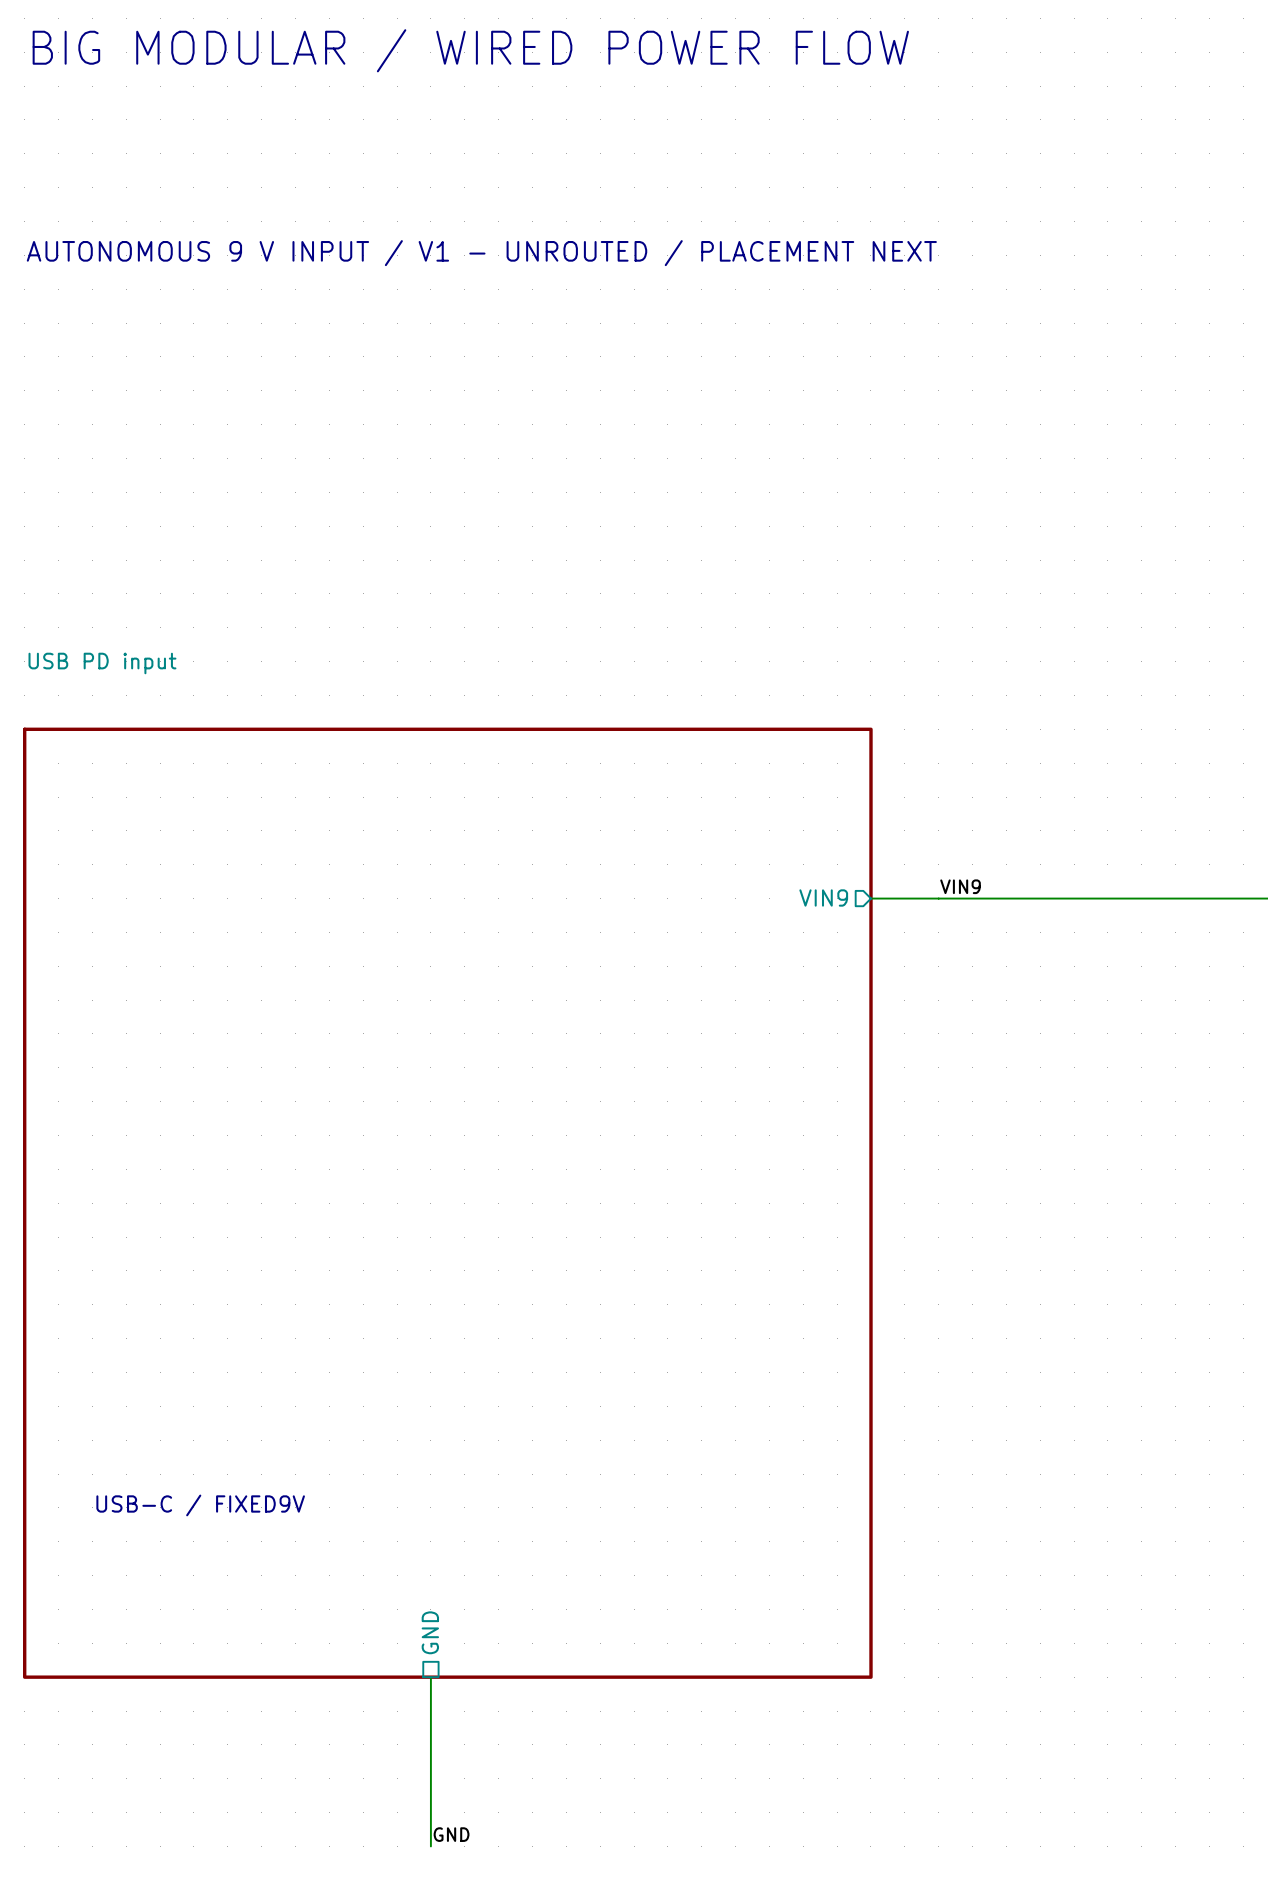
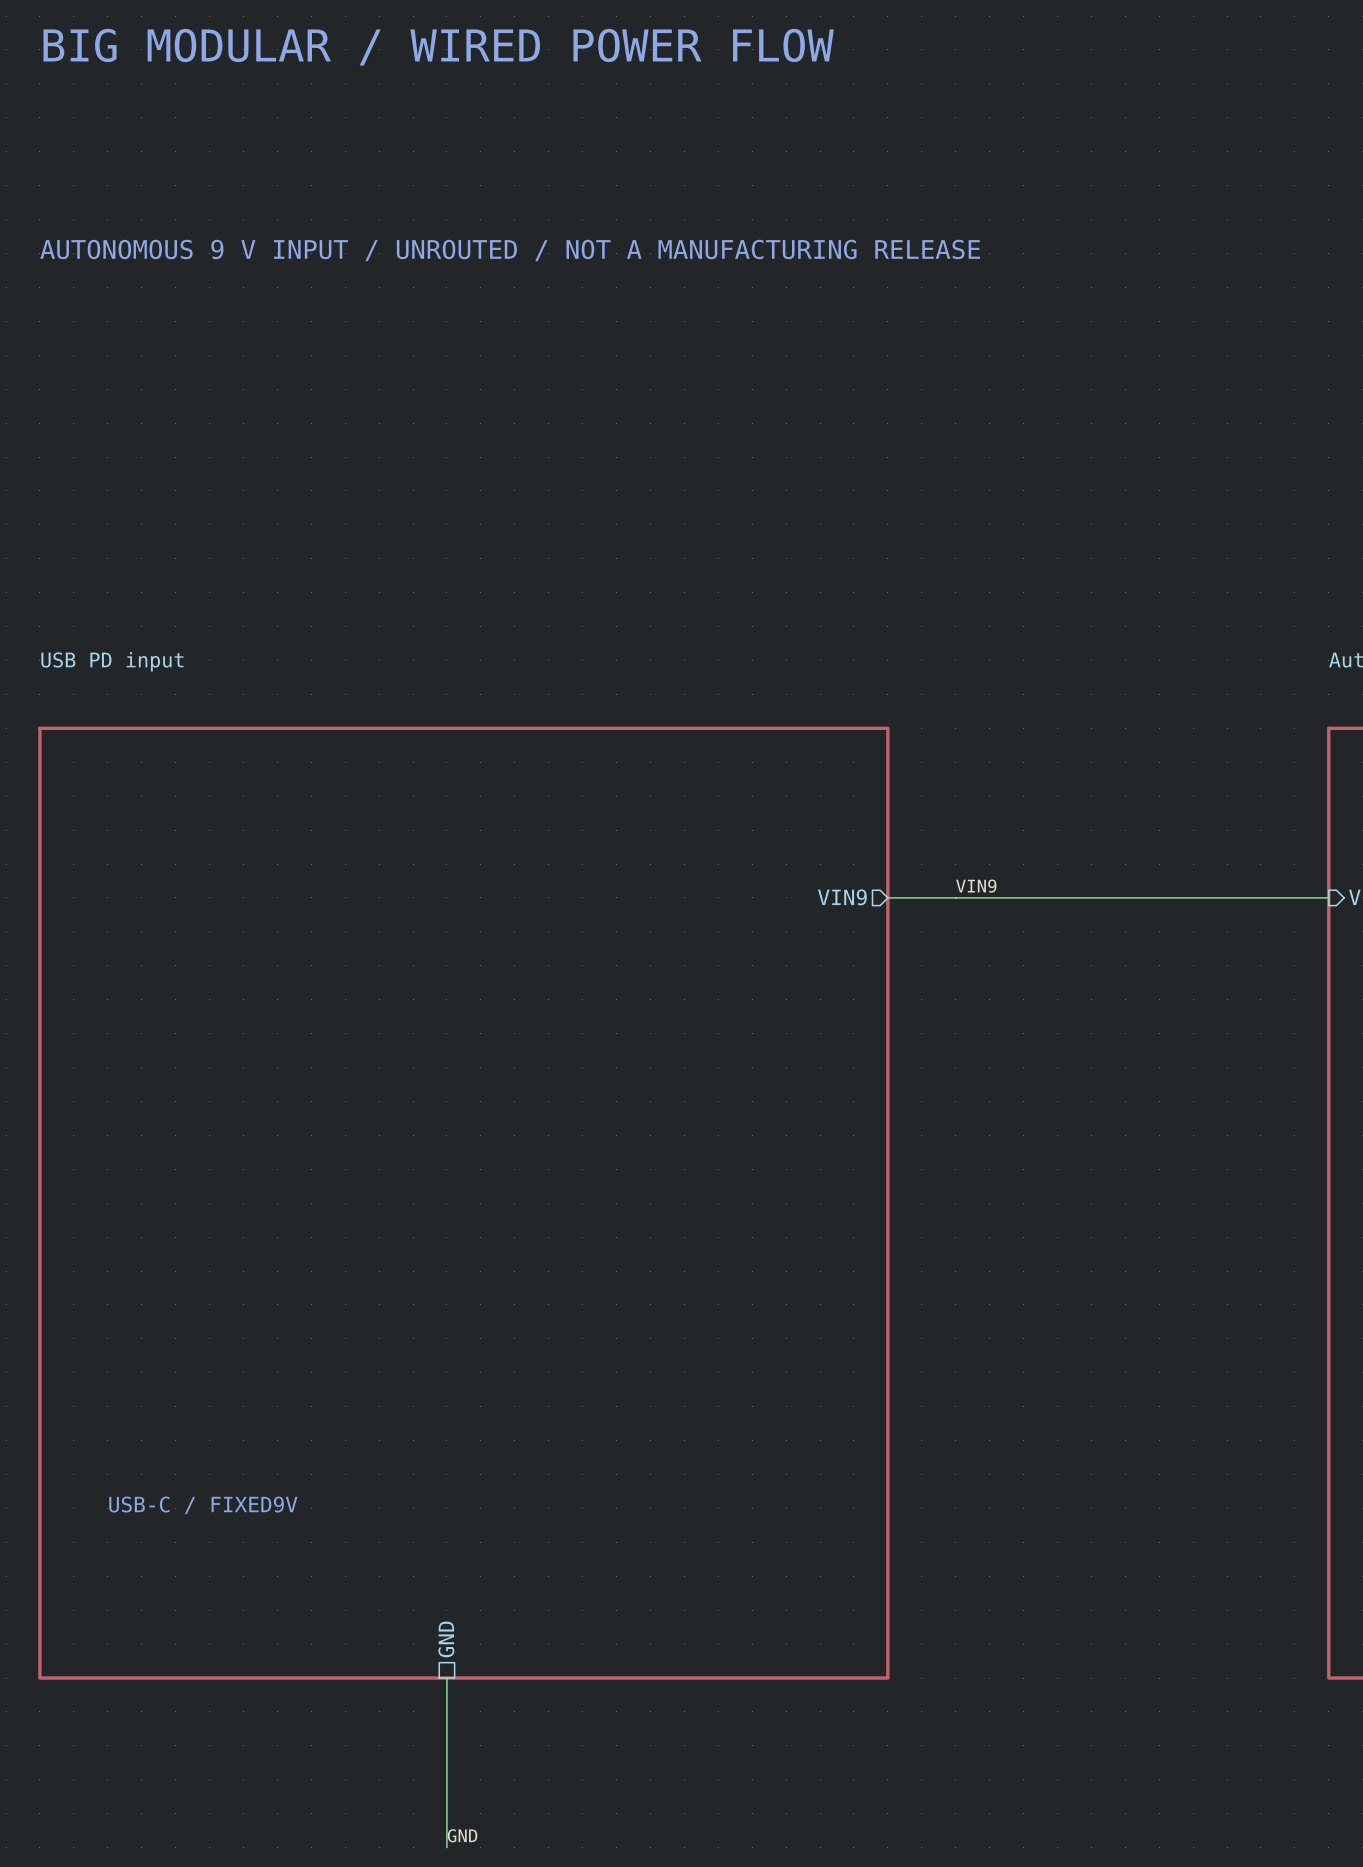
text: AUTONOMOUS 9 V INPUT / V1 - UNROUTED / PLACEMENT NEXT (481, 253) -> AUTONOMOUS 9 V INPUT / UNROUTED / NOT A MANUFACTURING RELEASE (510, 250)

